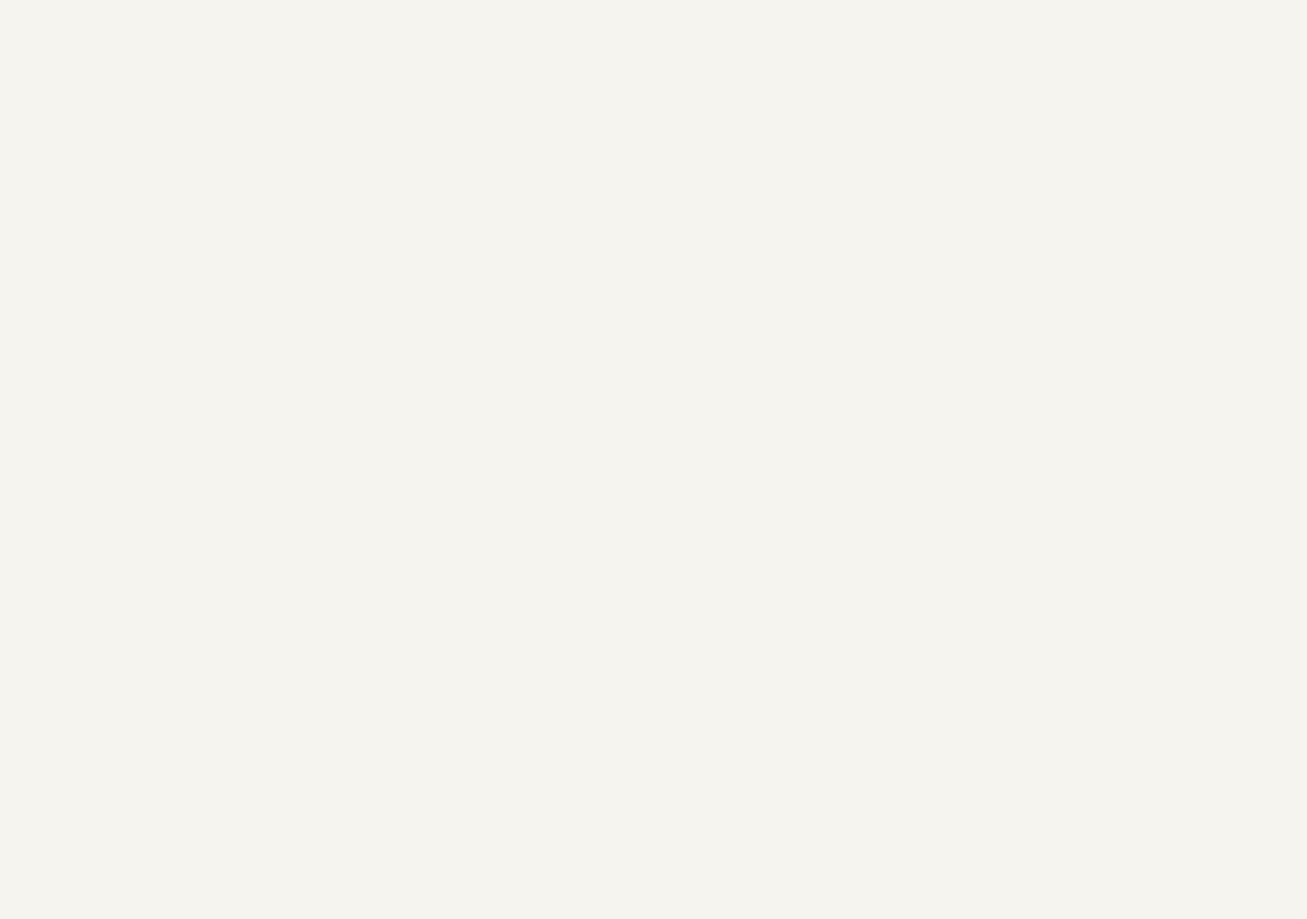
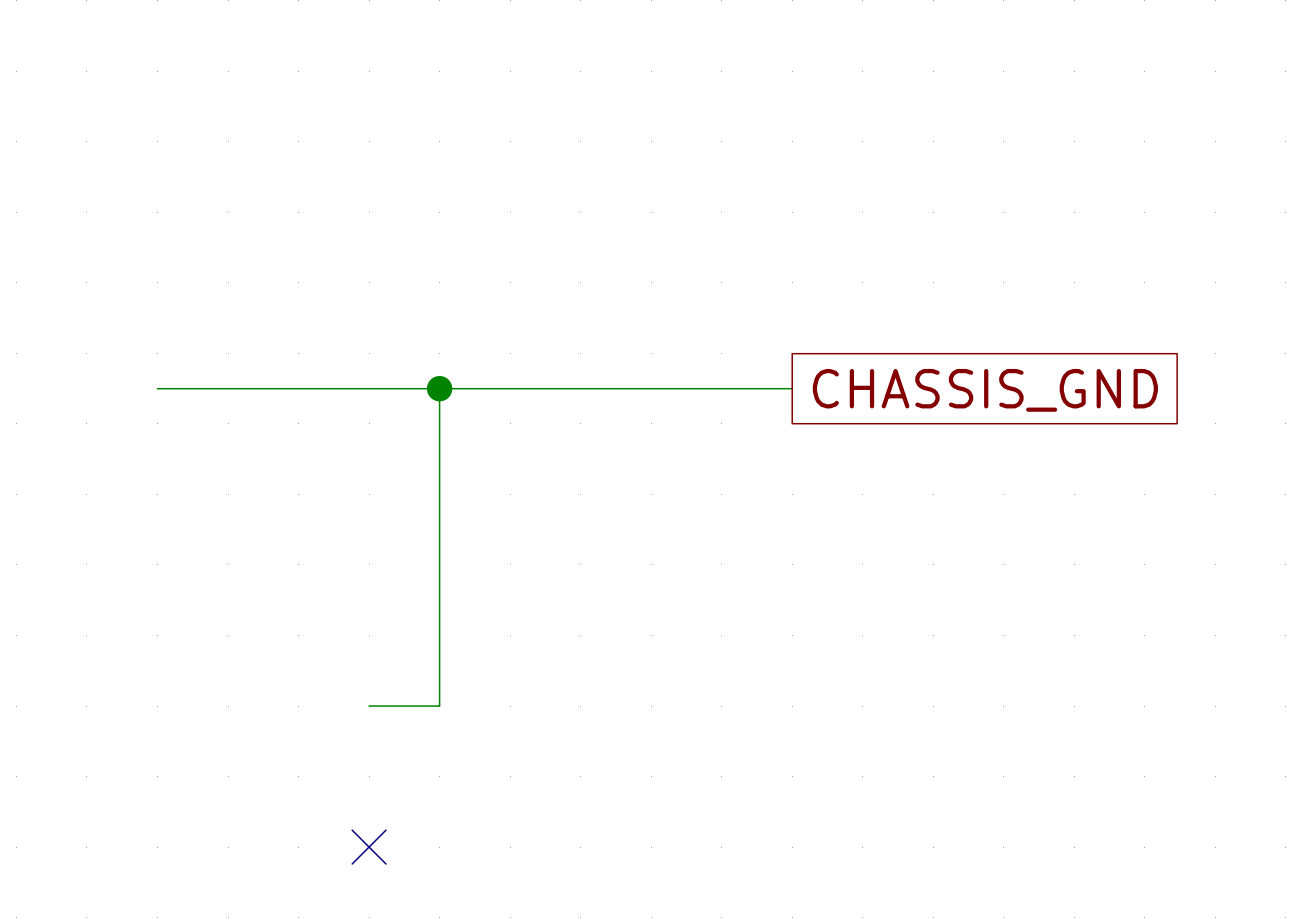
wire: none -> (157, 388) (792, 388)
wire: none -> (439, 388) (439, 706) (369, 706)
junction: none -> (439, 388)
global label: none -> CHASSIS_GND (985, 390)
no-connect mark: none -> (369, 847)

